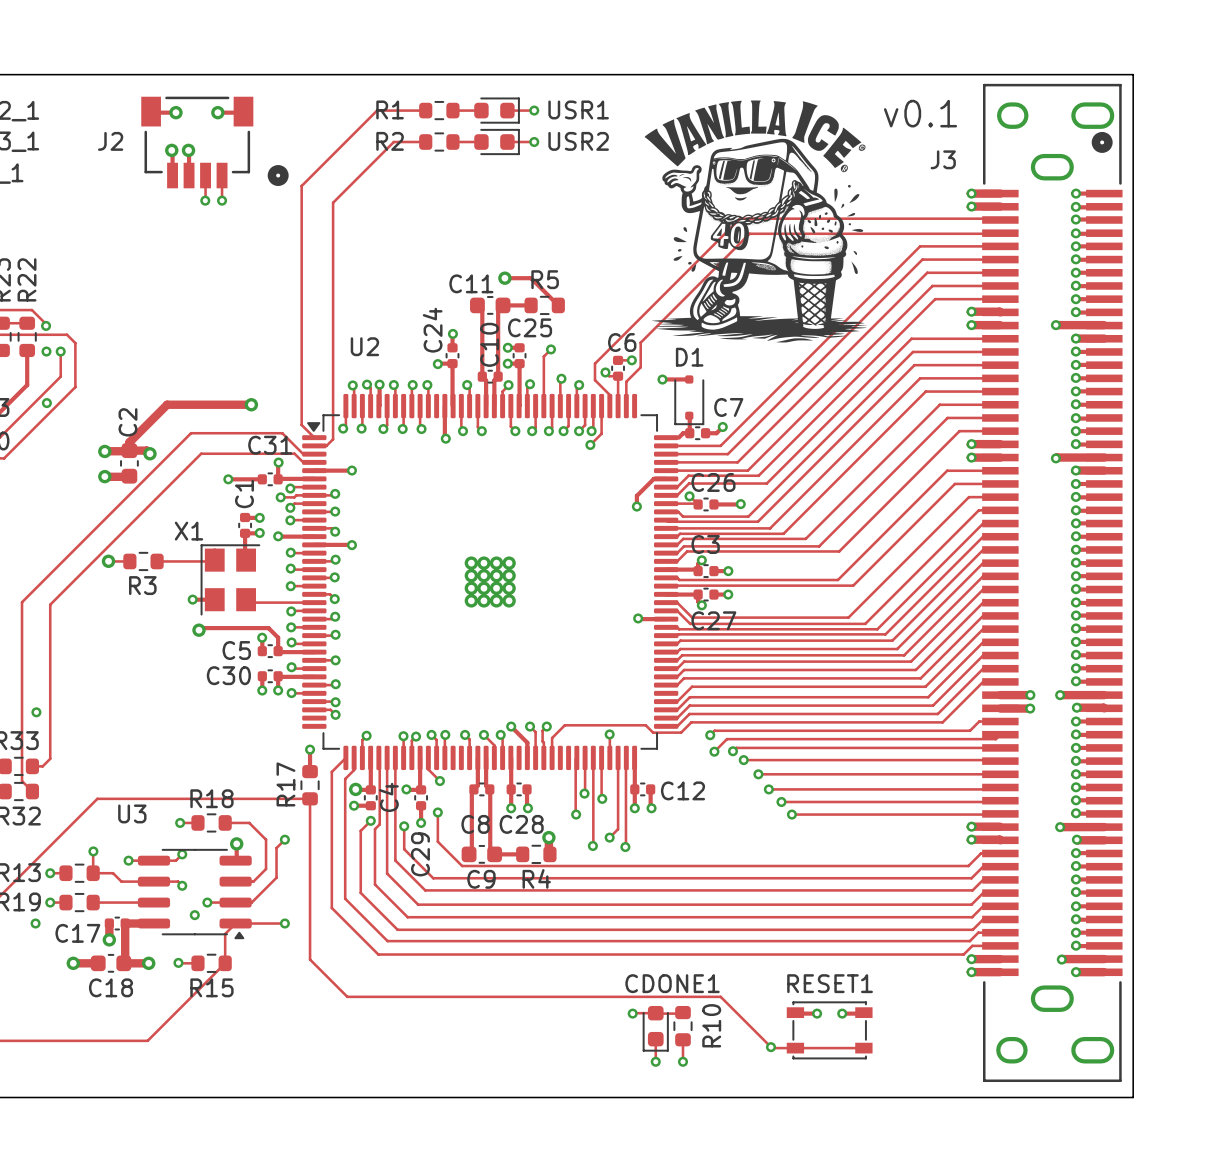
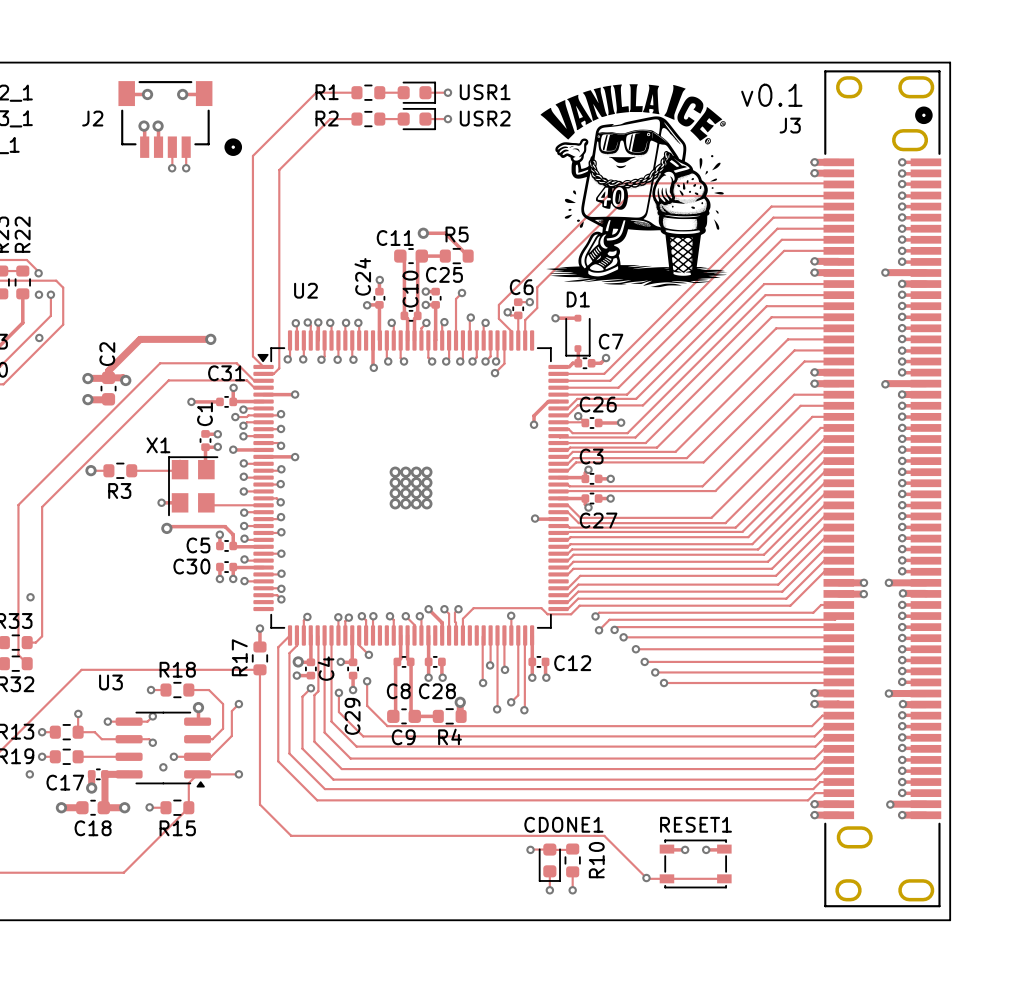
J3 footprint: [982, 83, 1123, 1083] -> [823, 70, 942, 908]

